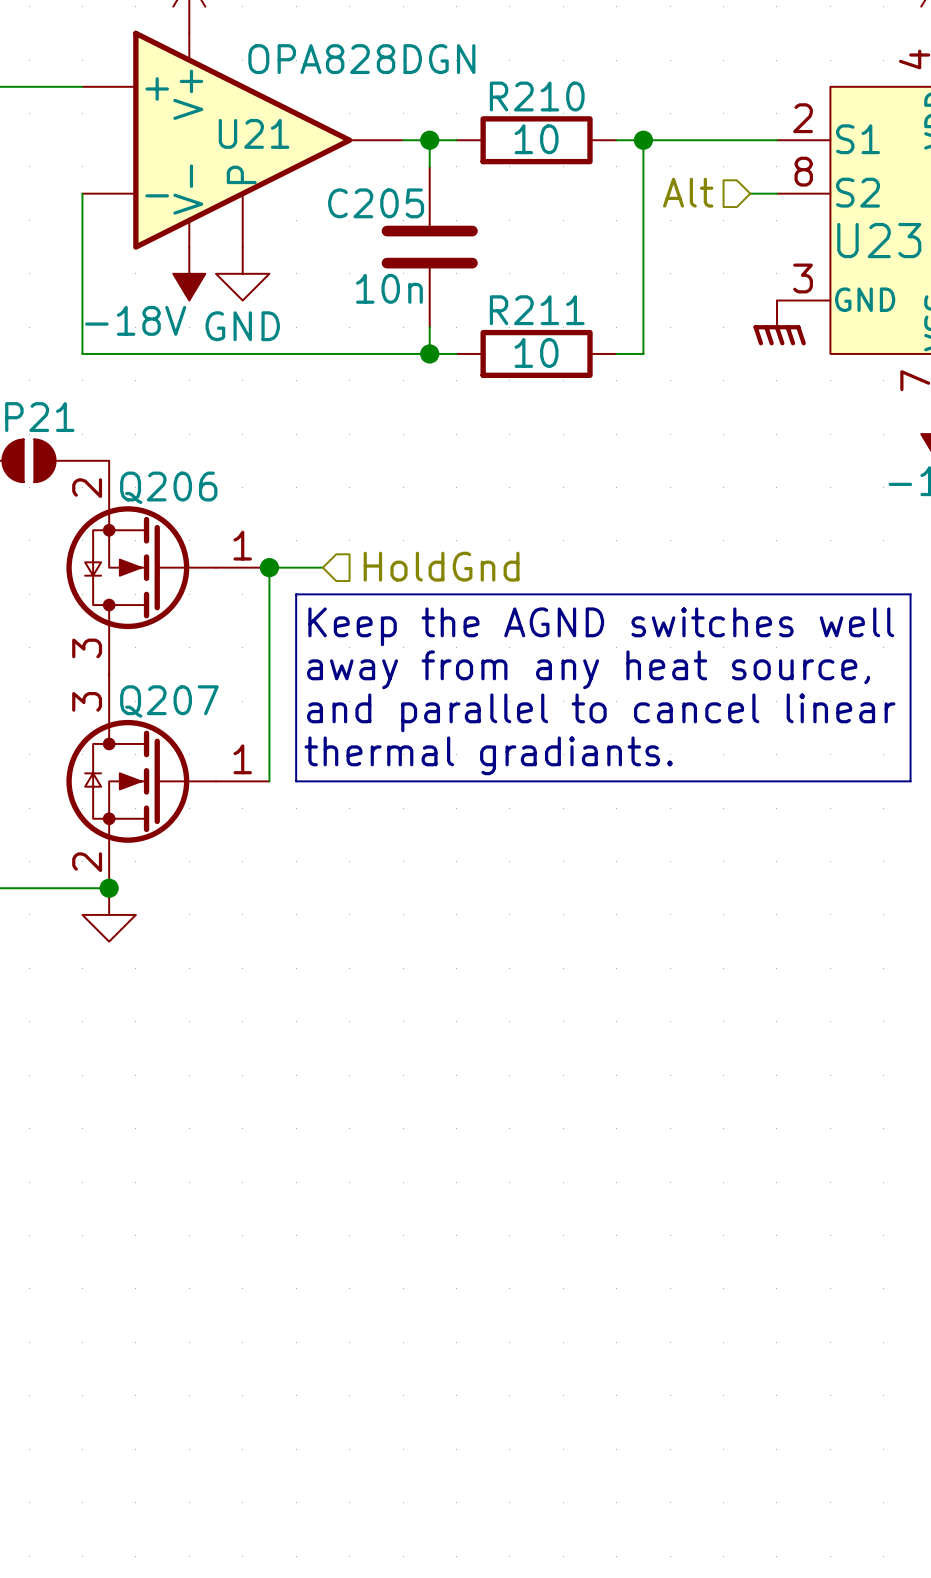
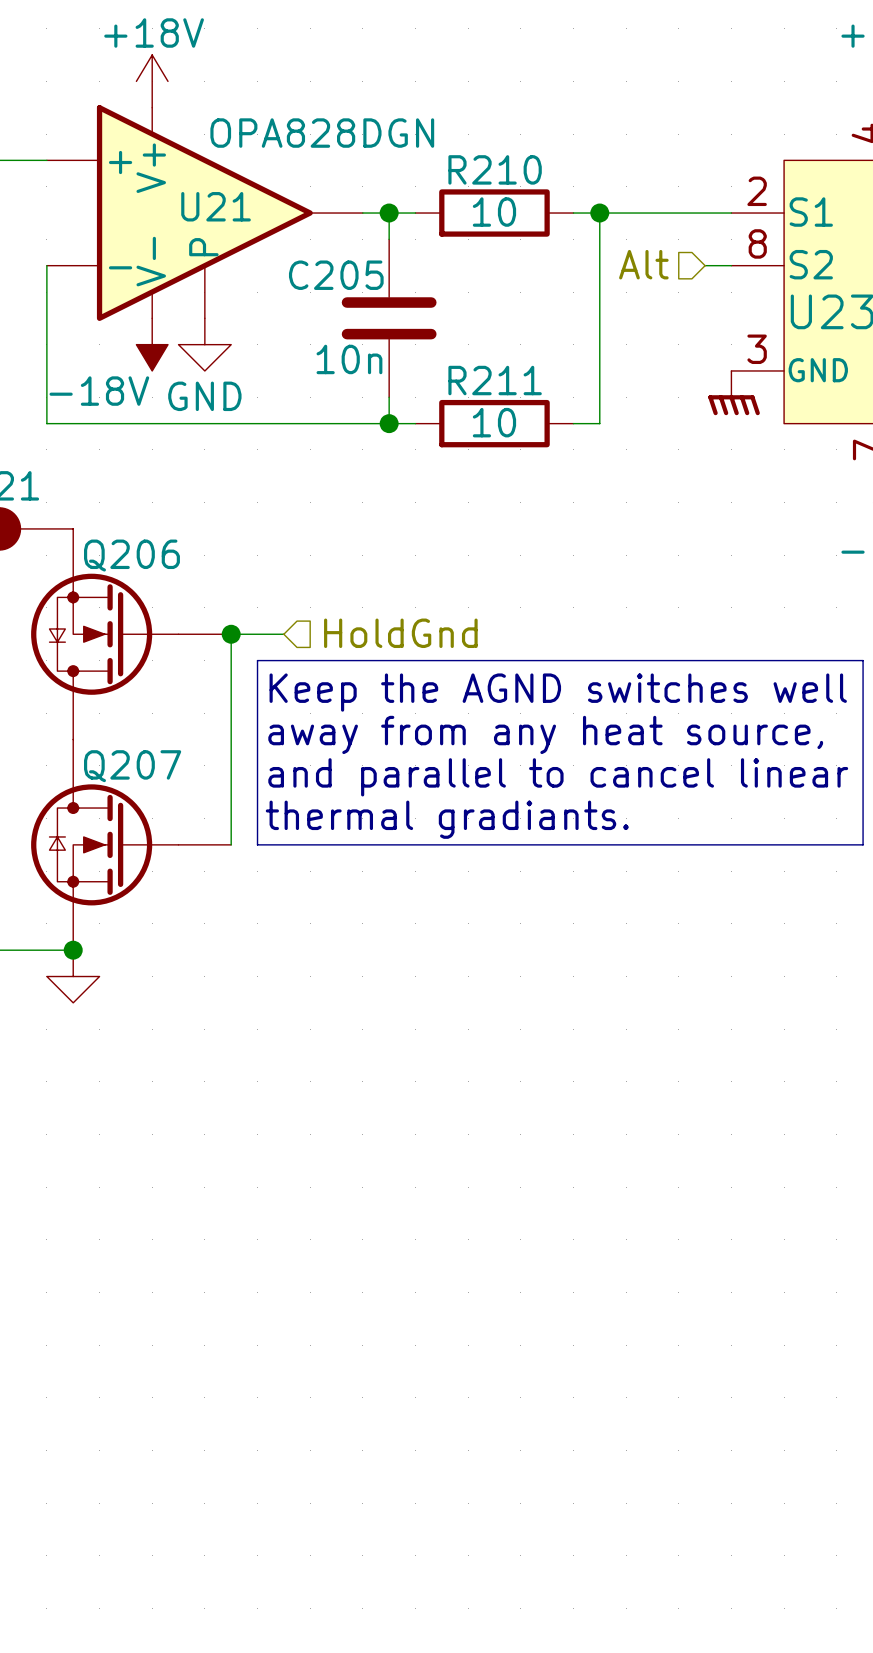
Q206 pin number: 2 (87, 488) -> none
Q206 pin number: 1 (242, 545) -> none
Q206 pin number: 3 (87, 648) -> none
Q207 pin number: 3 (87, 701) -> none
Q207 pin number: 1 (242, 759) -> none
Q207 pin number: 2 (87, 862) -> none

